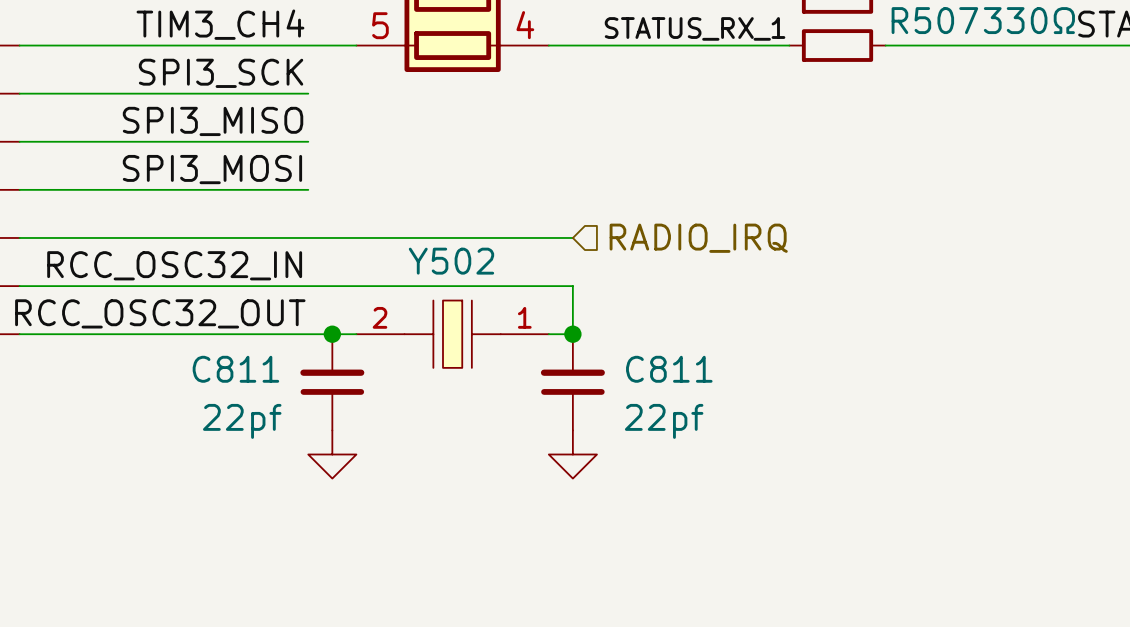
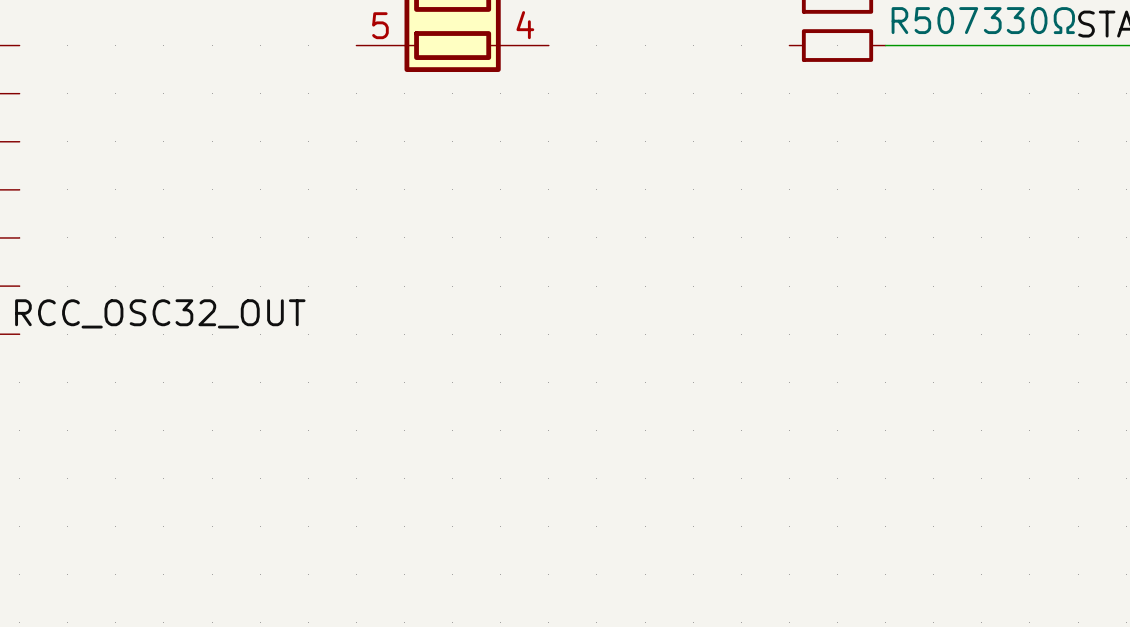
label: TIM3_CH4 (220, 24) -> none
label: STATUS_RX_1 (695, 28) -> none
wire: (19, 45) (356, 45) -> none
wire: (548, 45) (789, 45) -> none
label: SPI3_SCK (221, 73) -> none
wire: (19, 93) (308, 93) -> none
label: SPI3_MISO (213, 121) -> none
wire: (19, 141) (308, 141) -> none
label: SPI3_MOSI (212, 169) -> none
wire: (19, 189) (308, 189) -> none
wire: (19, 237) (572, 237) -> none
hierarchical label: RADIO_IRQ (698, 238) -> none
label: RCC_OSC32_IN (174, 265) -> none
wire: (19, 286) (572, 286) (572, 334) (548, 334) -> none
wire: (19, 334) (356, 334) -> none
junction: (332, 334) -> none
Y502: (452, 334) -> none
junction: (572, 334) -> none
C811: (332, 382) -> none
C811: (572, 382) -> none
power symbol: (332, 454) -> none
power symbol: (572, 454) -> none

